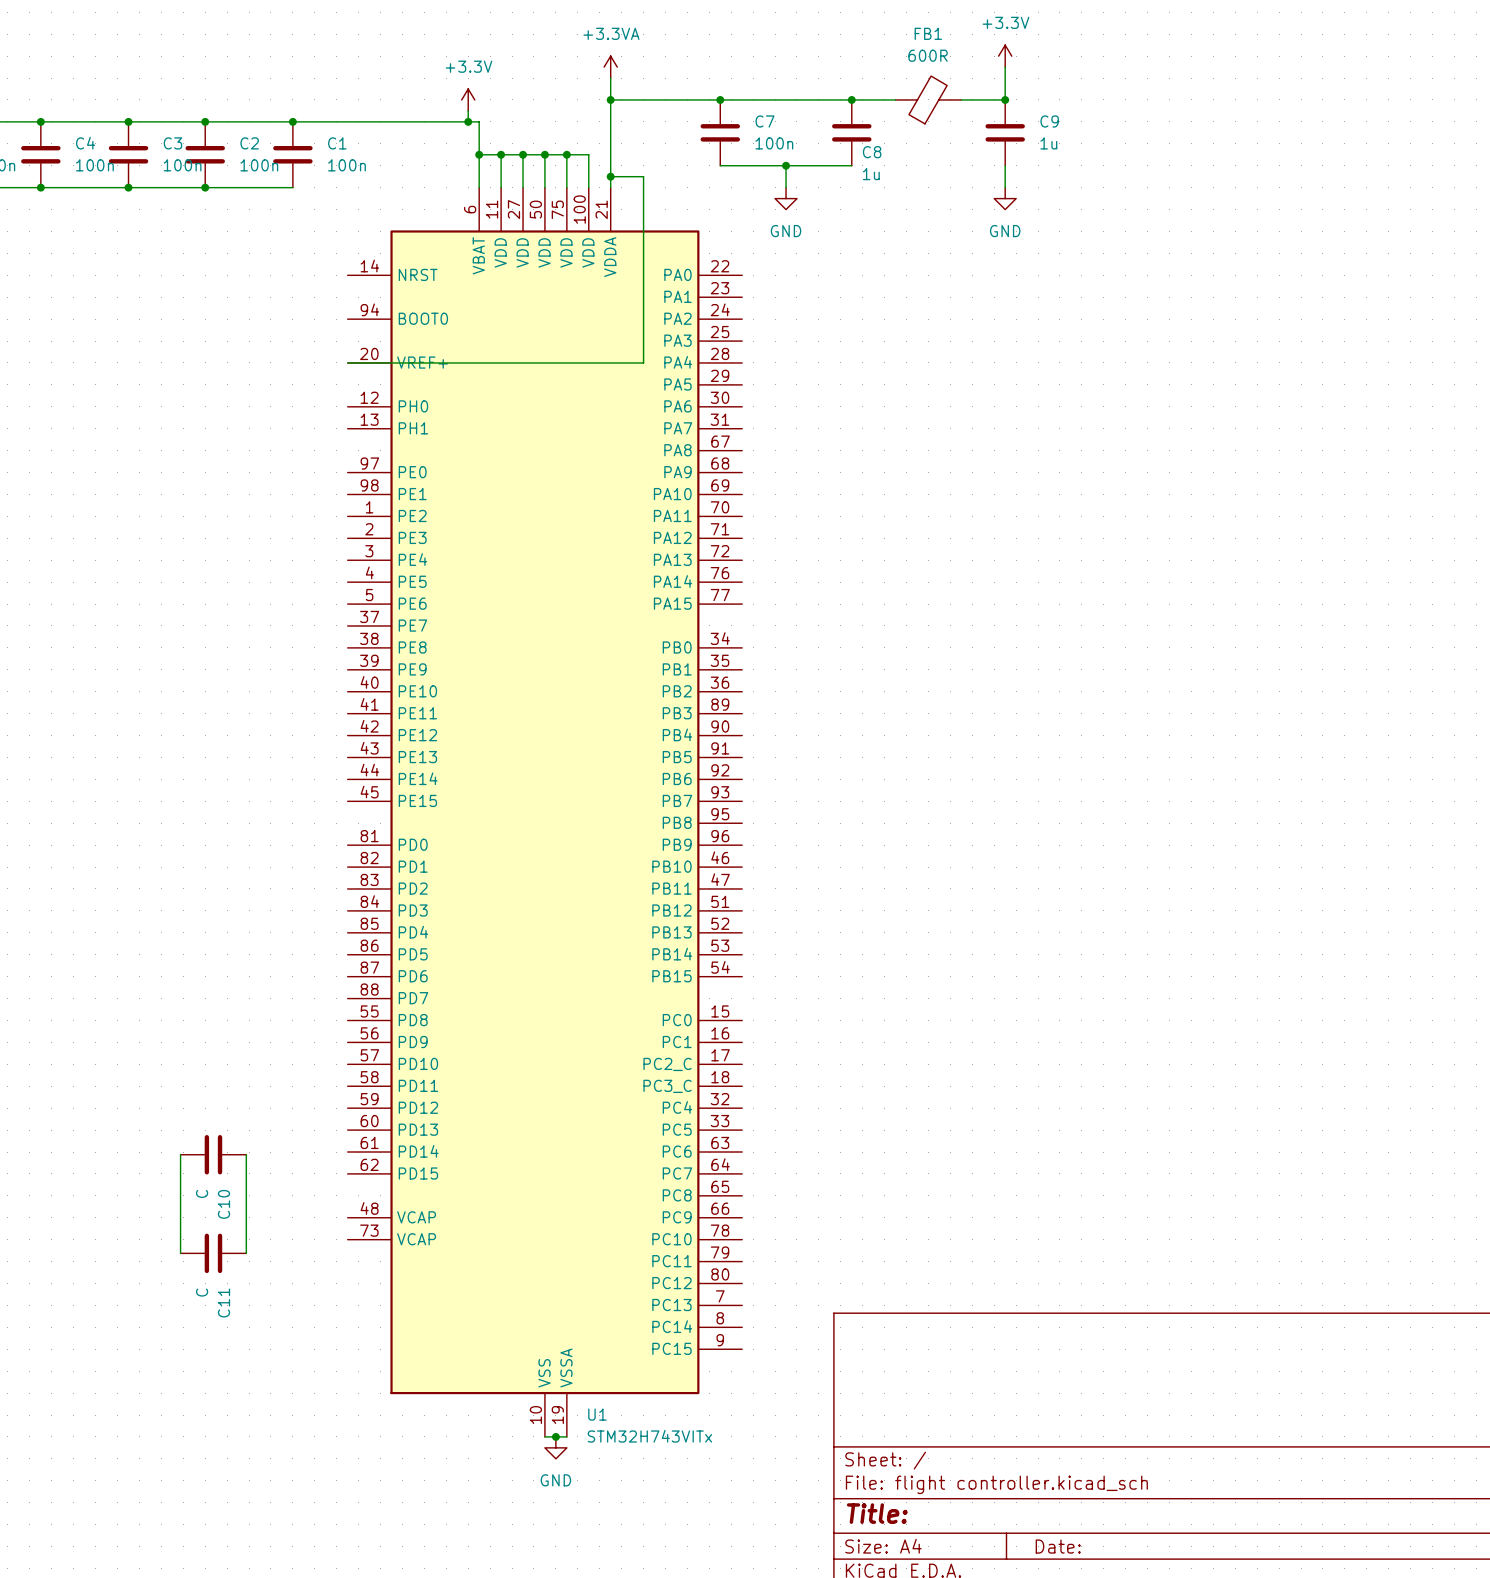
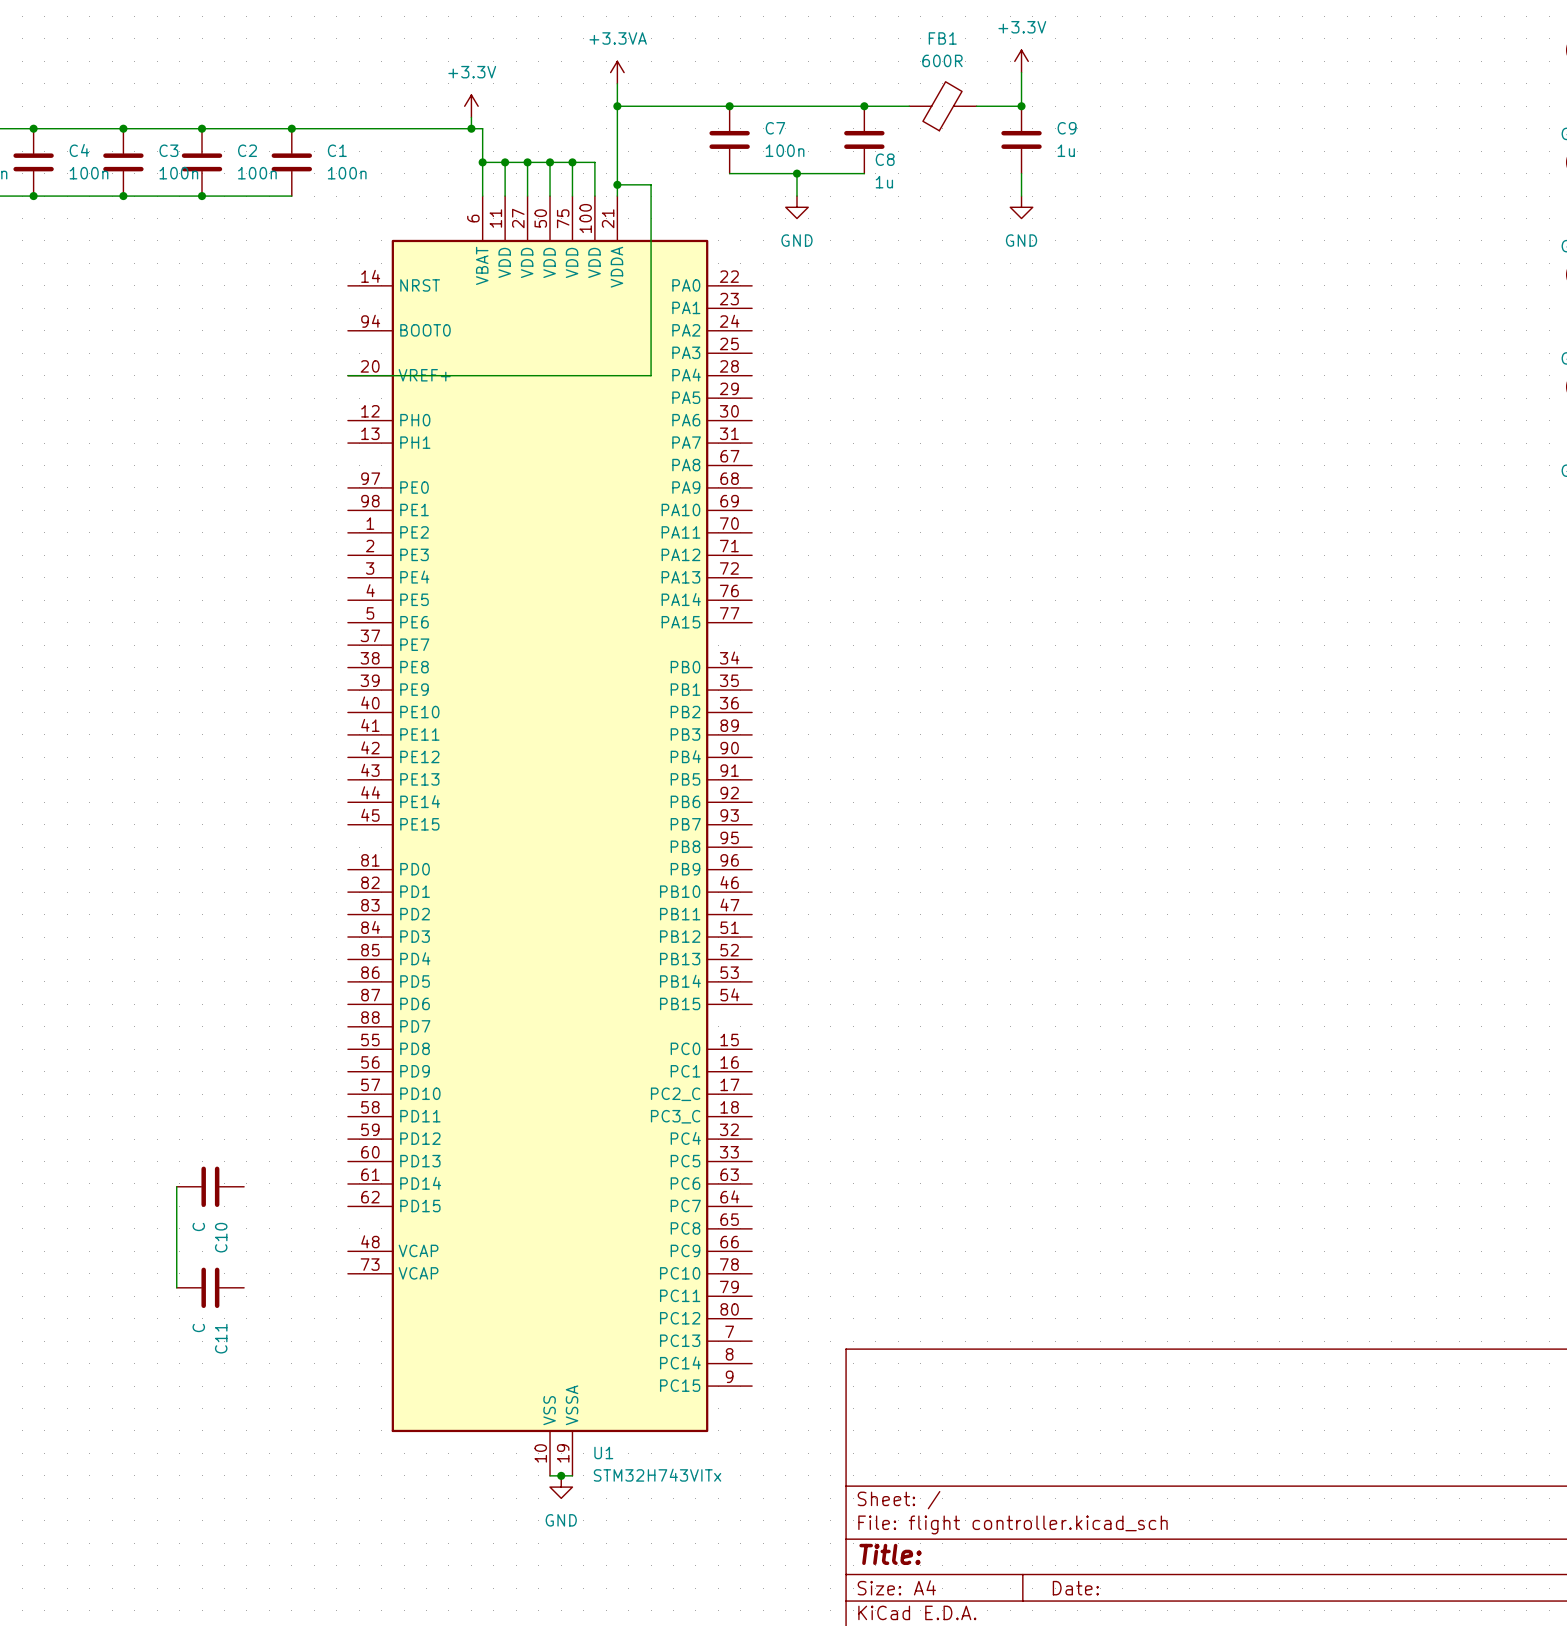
wire: (246, 1154) (246, 1253) -> none

